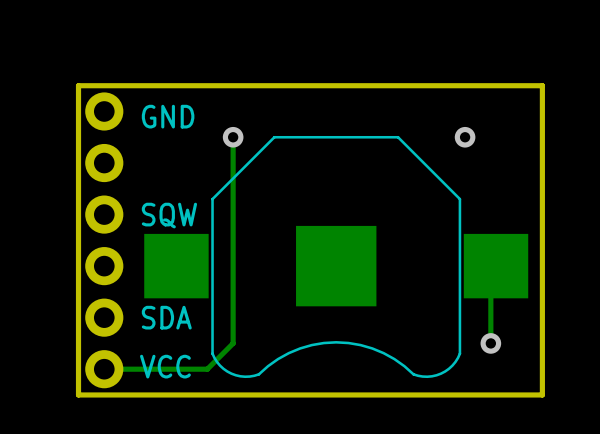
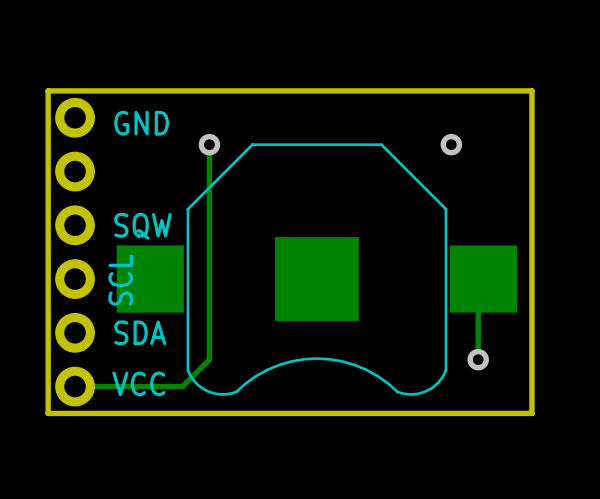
text: none -> SCL (120, 280)

